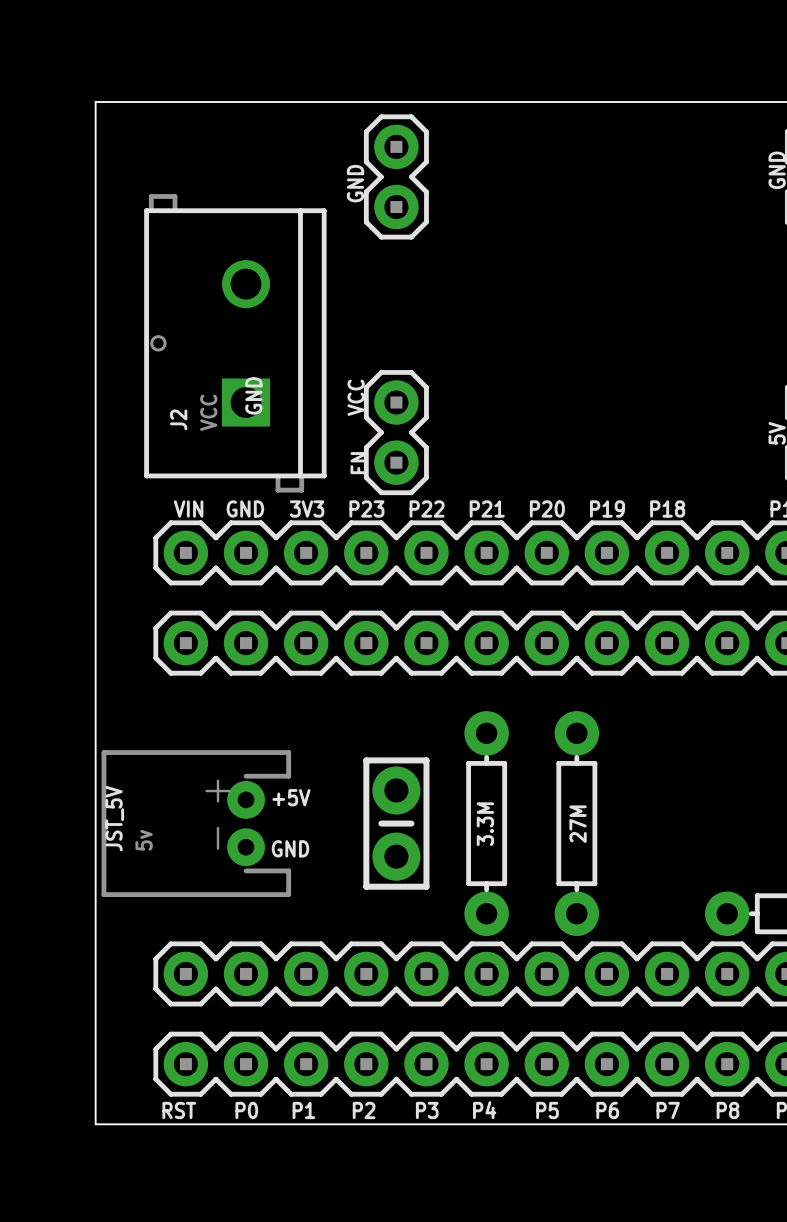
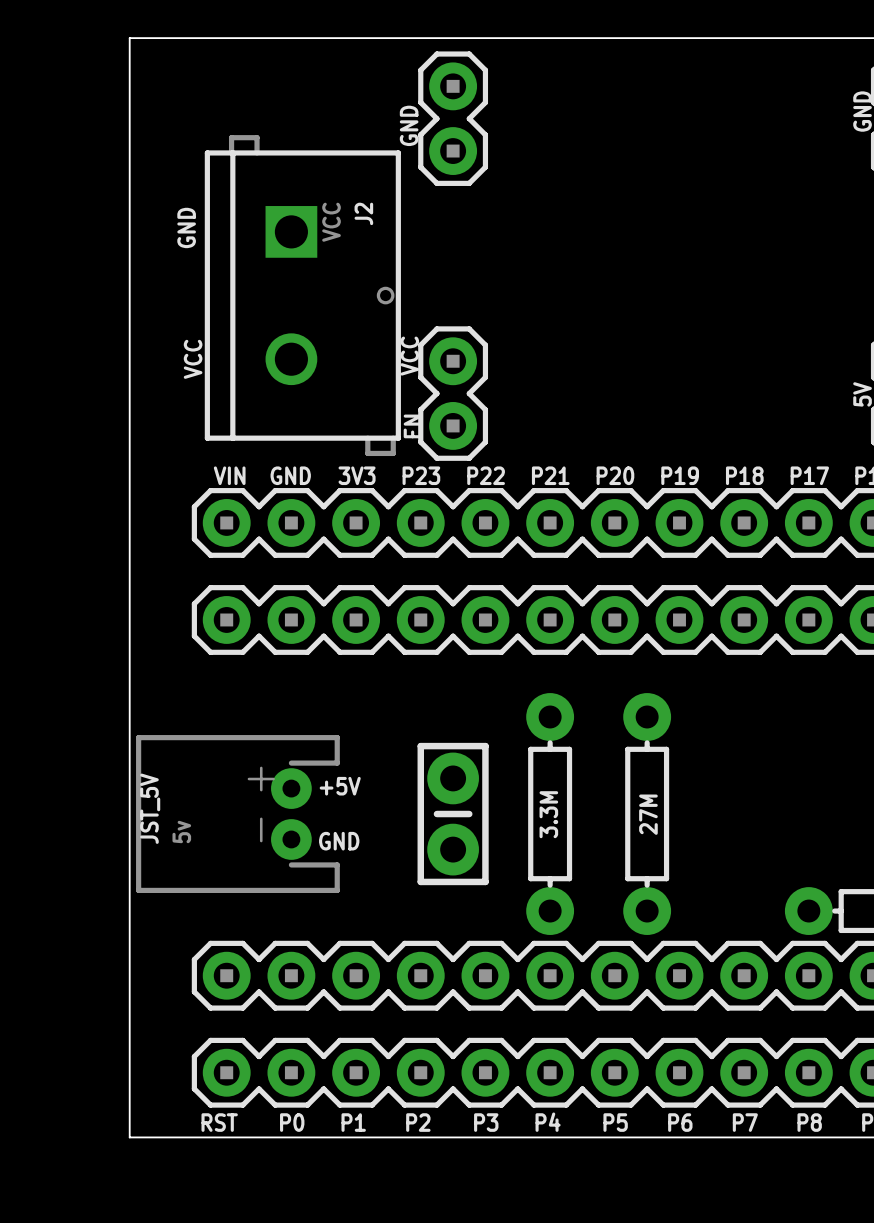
J2 rotation: 0° (235, 343) -> 180° (302, 295)
text position: GND (253, 395) -> GND (186, 227)
text: none -> VCC (193, 359)
text: none -> P17 (809, 475)

